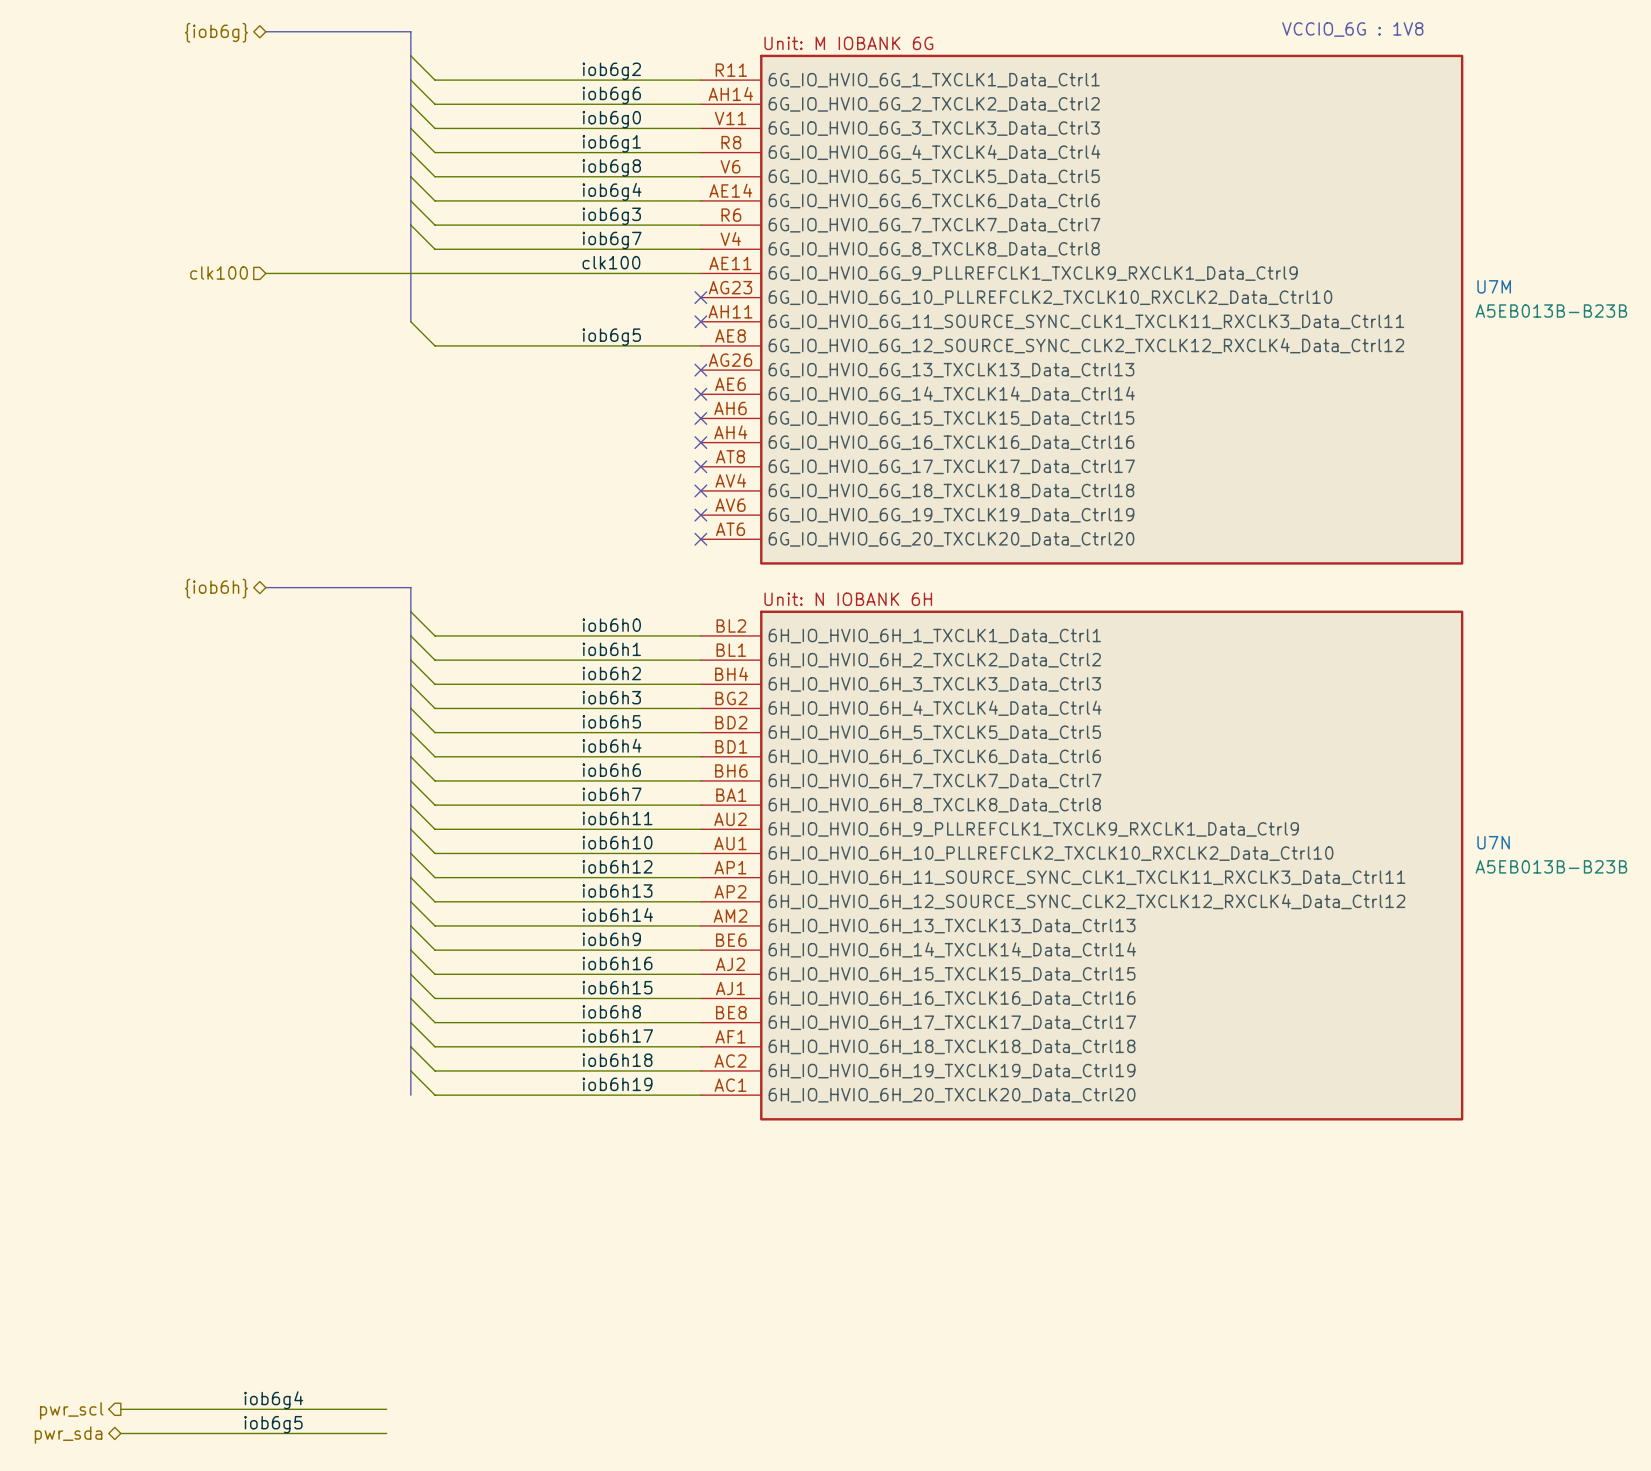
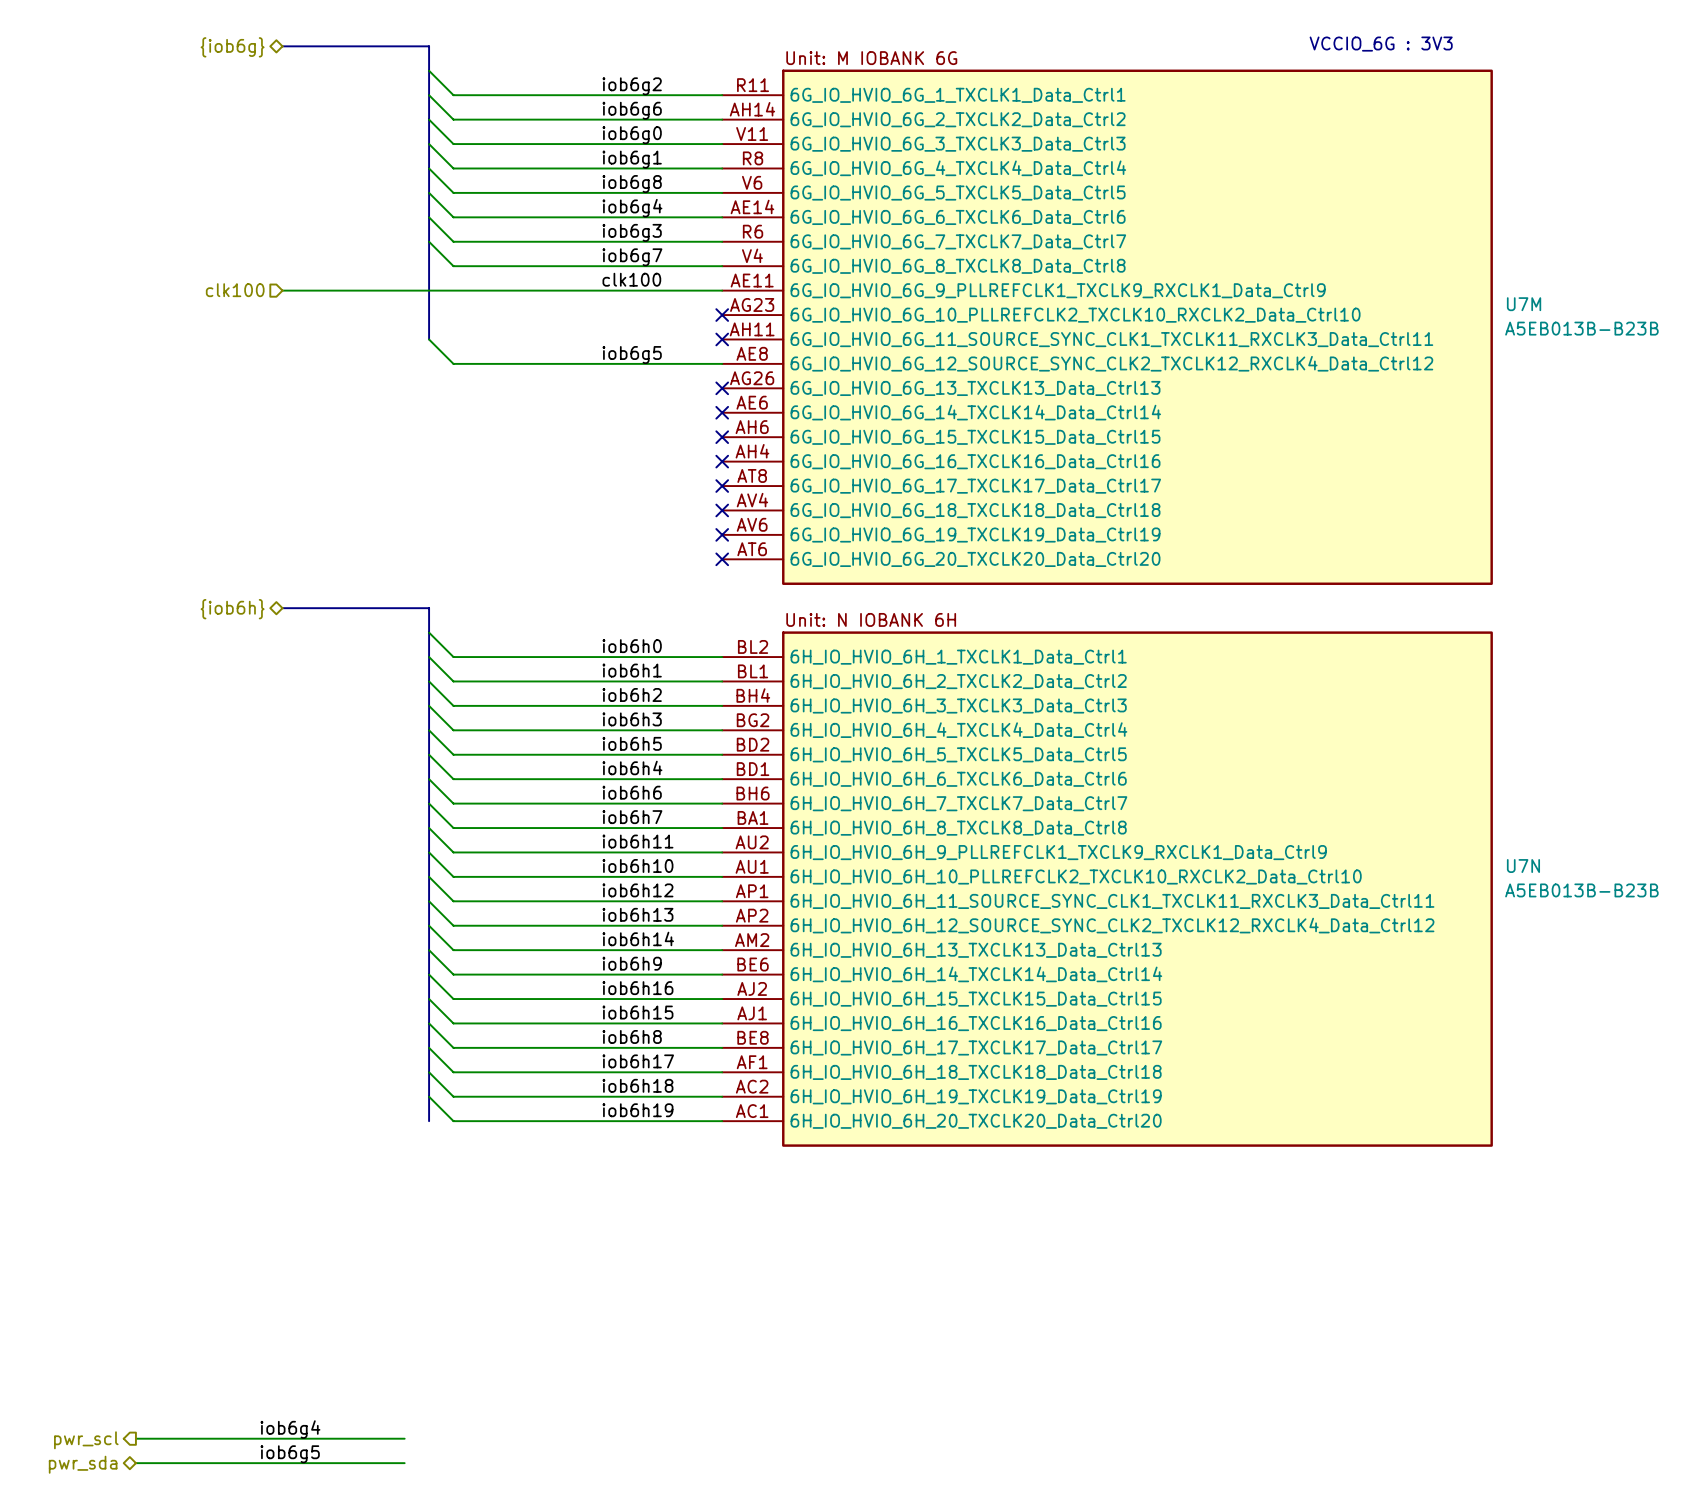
text: VCCIO_6G : 1V8 (1352, 29) -> VCCIO_6G : 3V3 (1381, 44)

